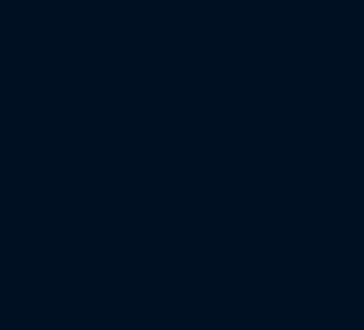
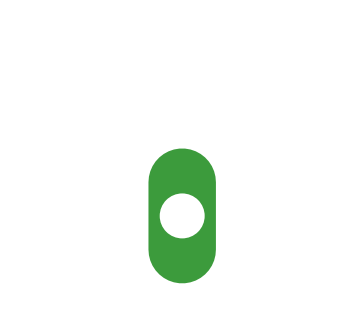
part: none -> (182, 215)

